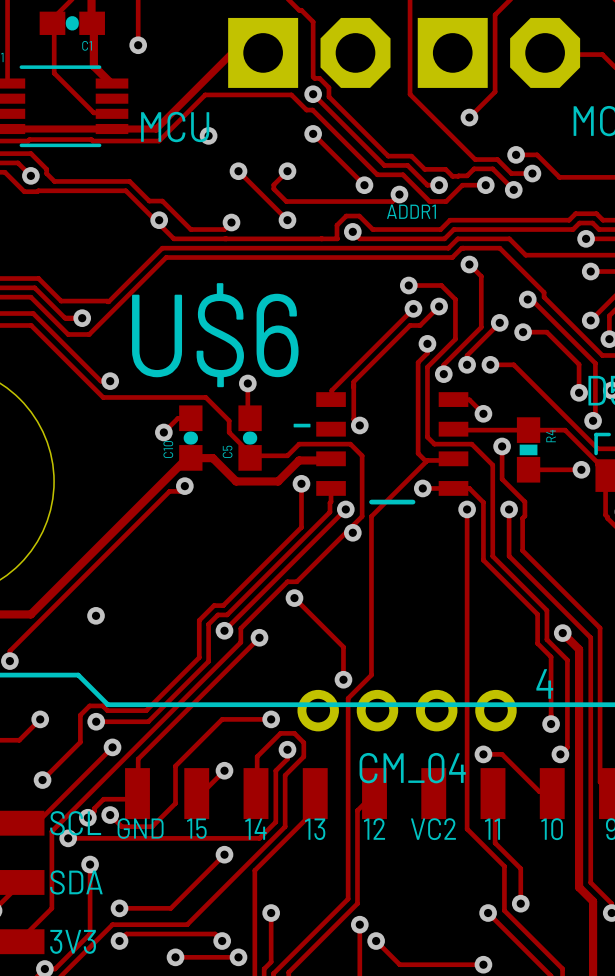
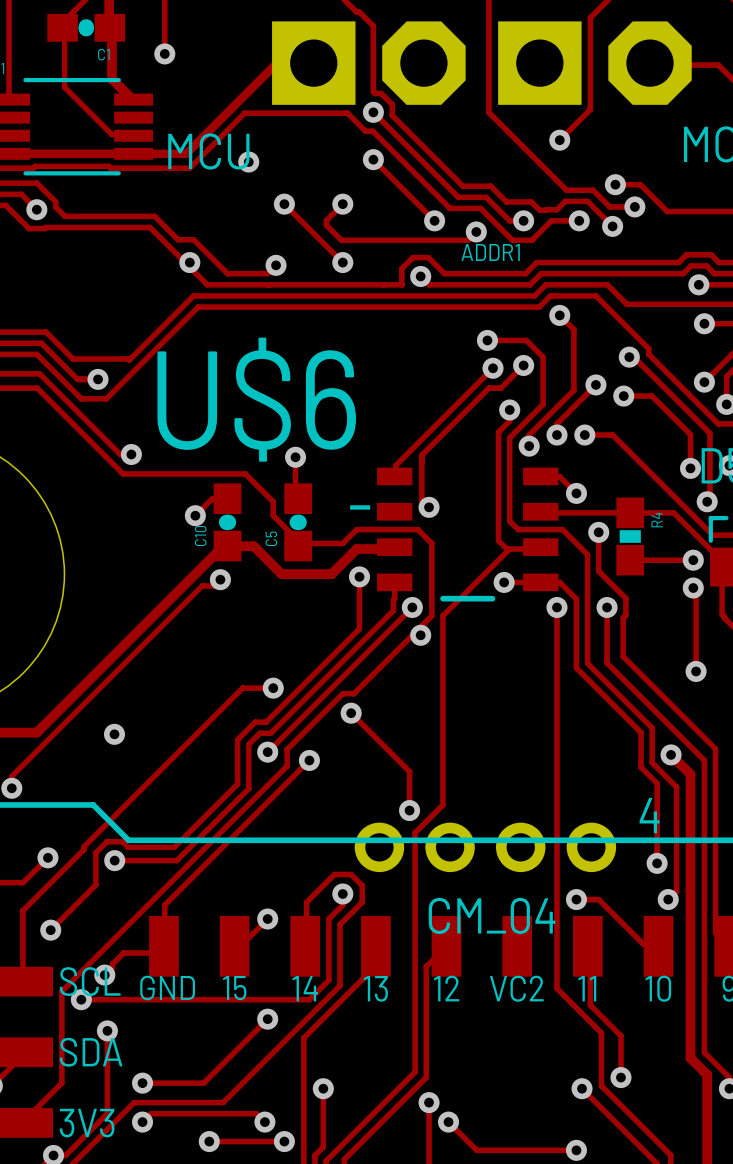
track: none -> (693, 588) (696, 590) (696, 671)
via: none -> (693, 588)
via: none -> (696, 671)
via: none -> (273, 688)
track: (271, 719) (222, 719) (175, 766) (175, 803) (152, 826) (121, 826) (110, 815) -> none
via: (271, 719) -> none
track: (112, 747) (37, 822) (19, 822) -> (273, 688) (242, 688) (22, 910) (22, 980)
via: (112, 747) -> none
via: (110, 815) -> none

